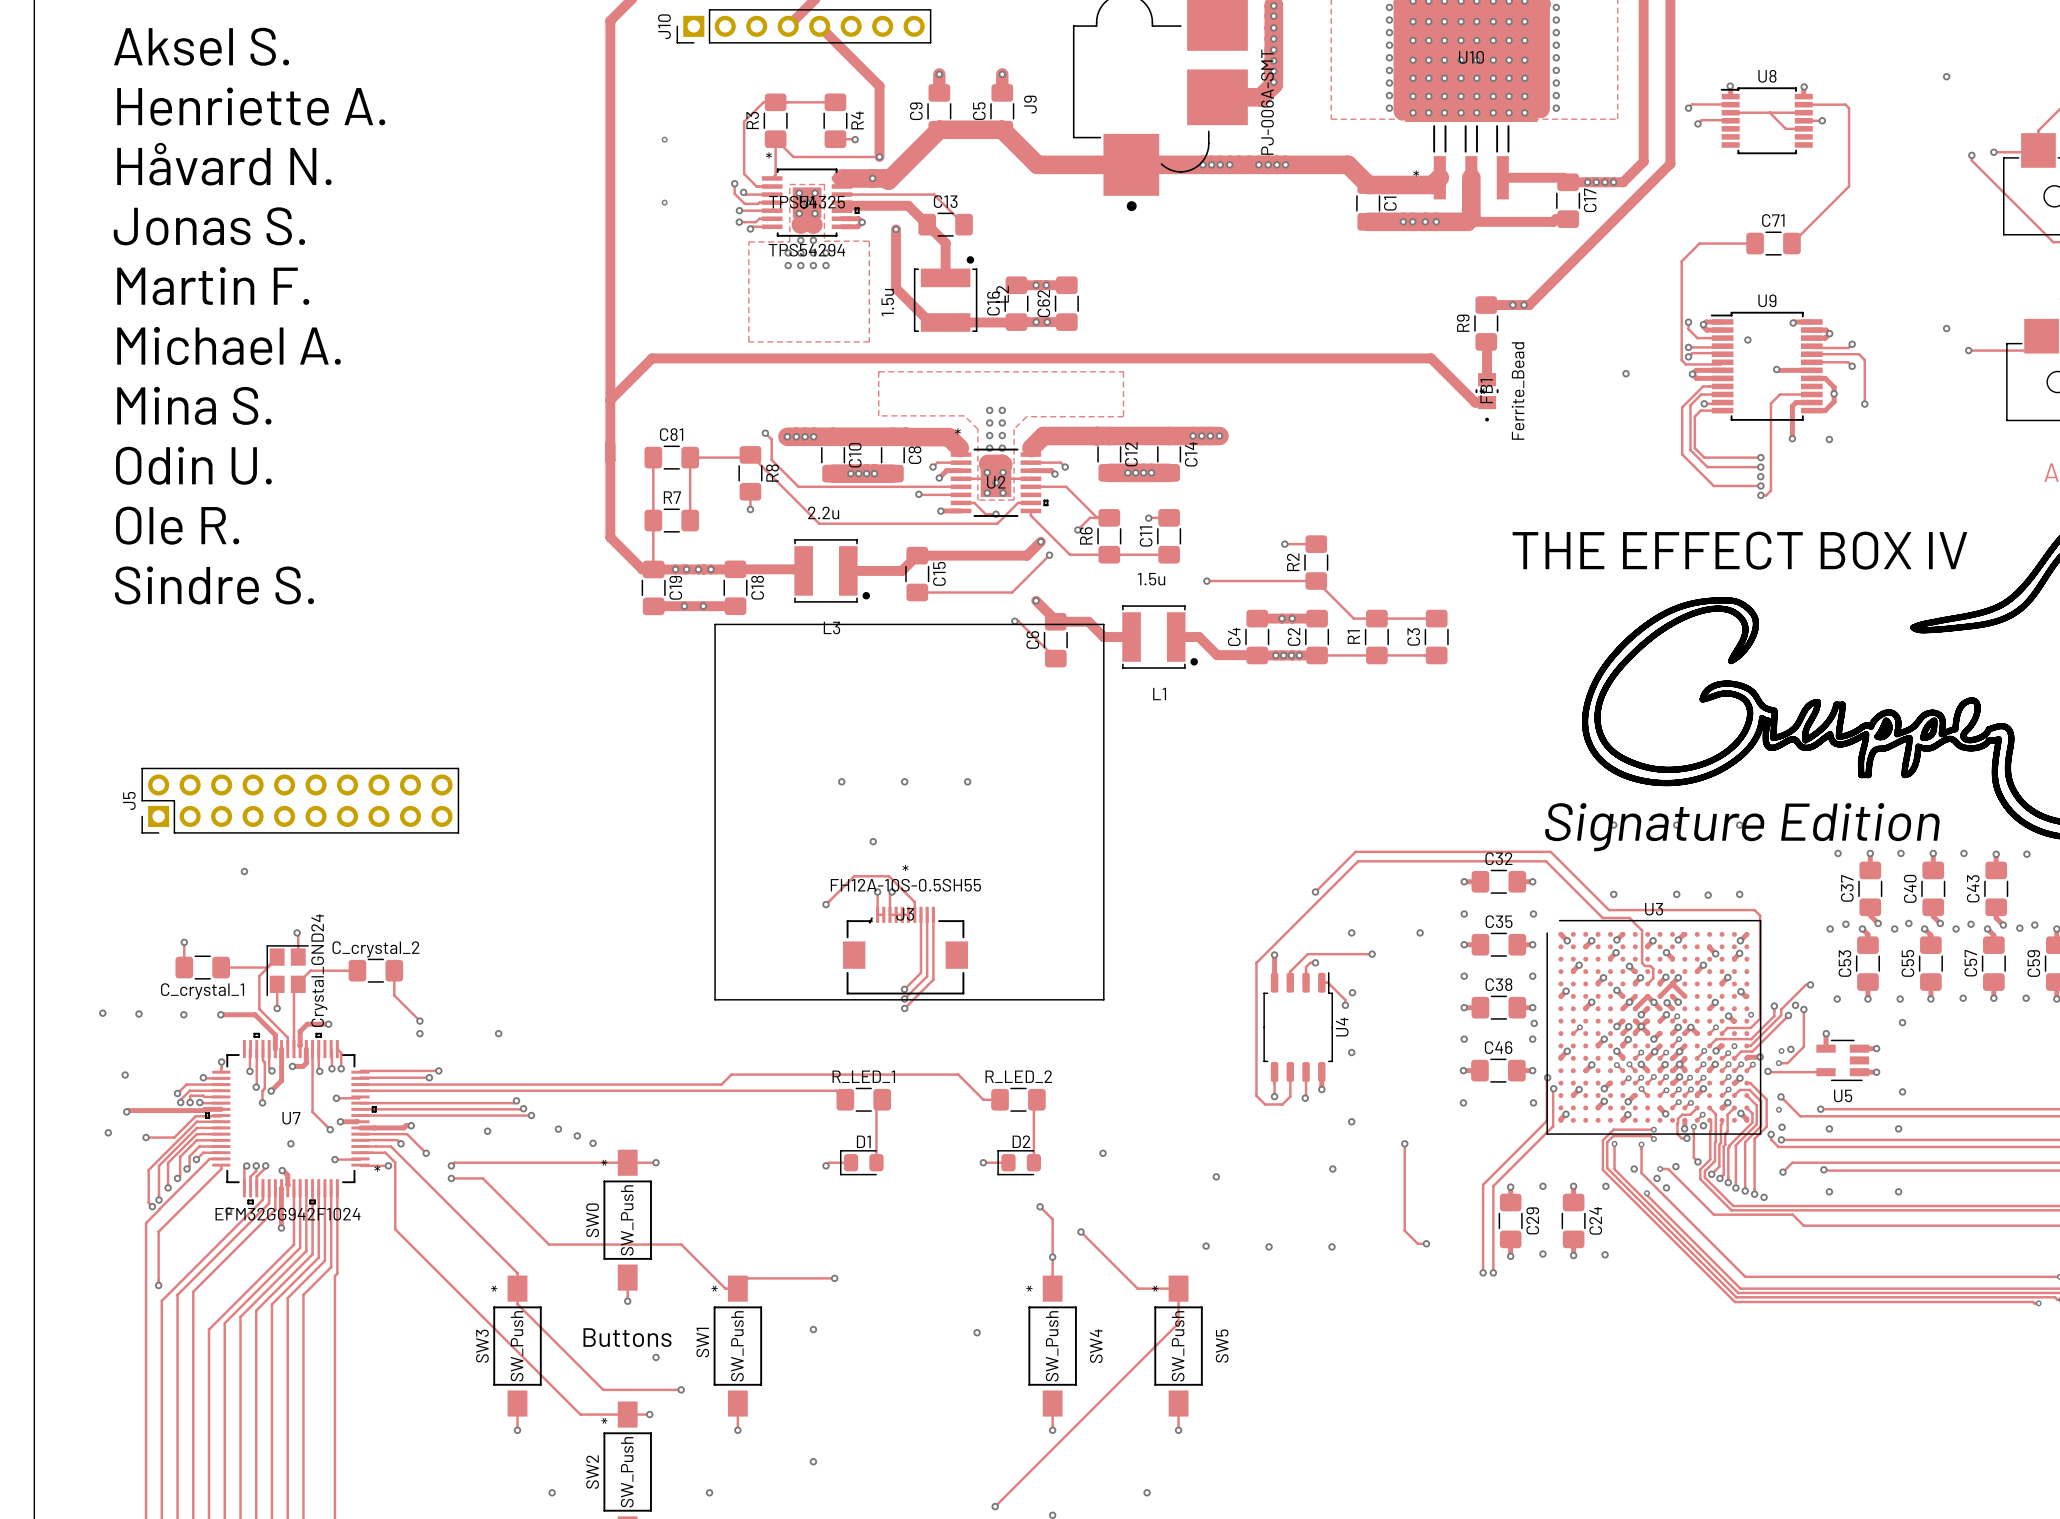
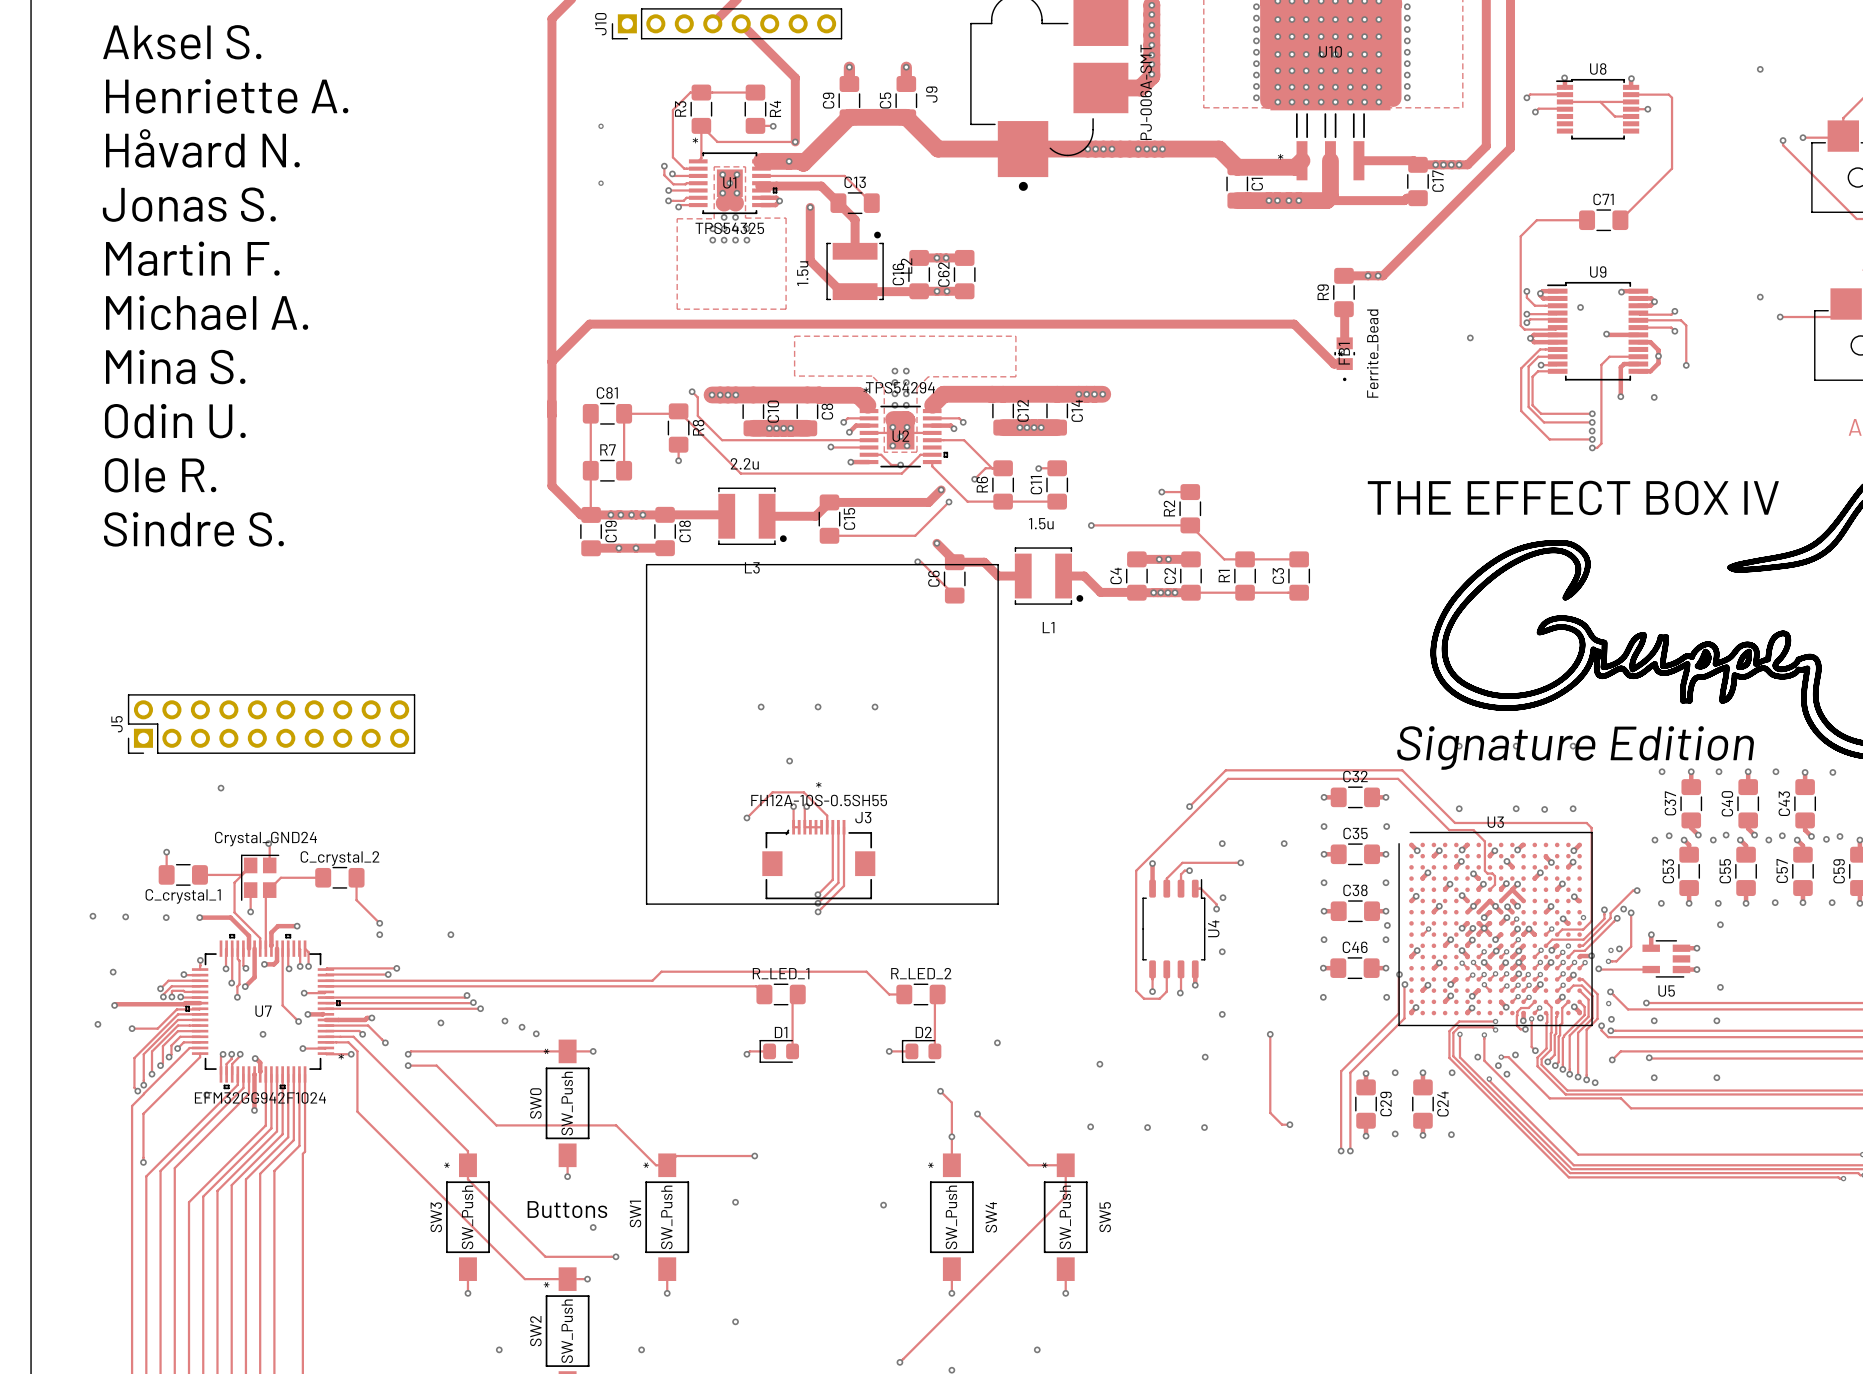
U1 value position: TPS54325 (807, 202) -> TPS54325 (729, 228)
U2 value position: TPS54294 (806, 250) -> TPS54294 (900, 387)
J3 name position: J3 (905, 914) -> J3 (863, 817)
Crystal_GND24 name rotation: 0° (319, 970) -> 90° clockwise (265, 839)

